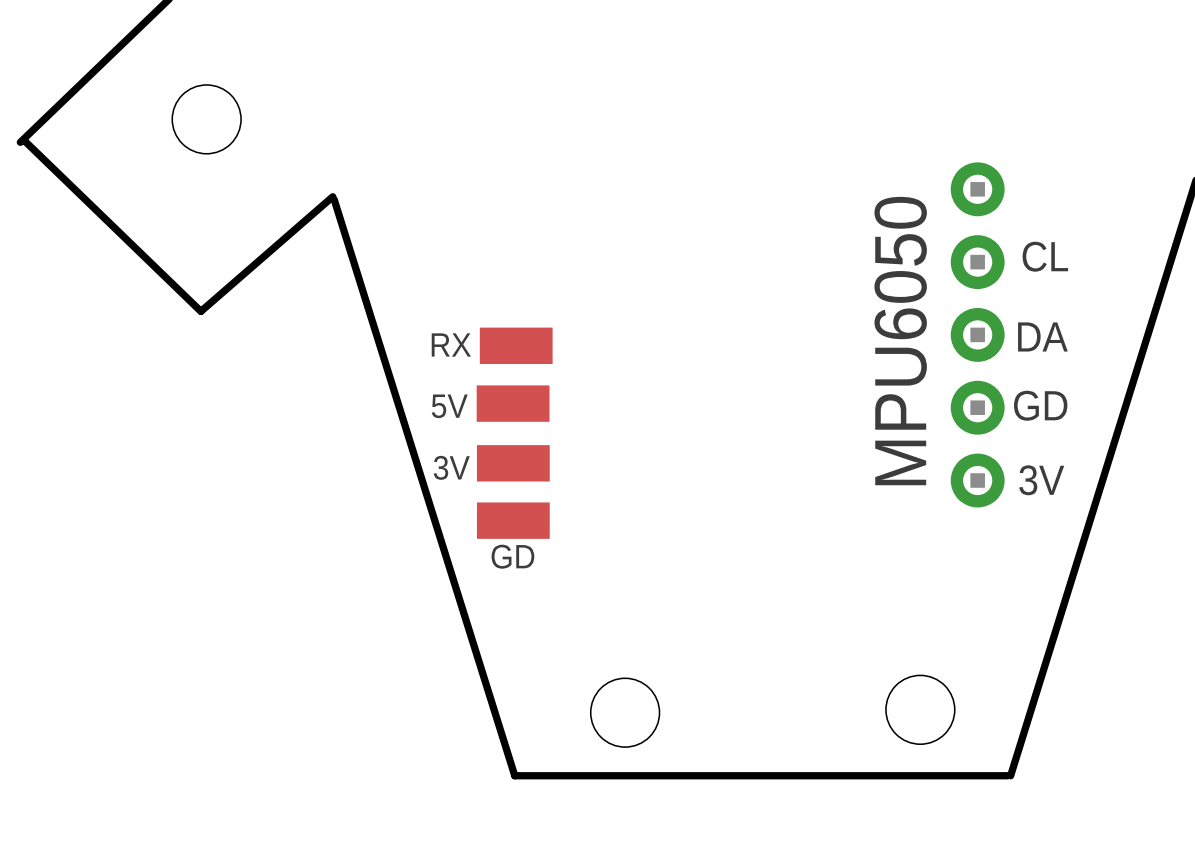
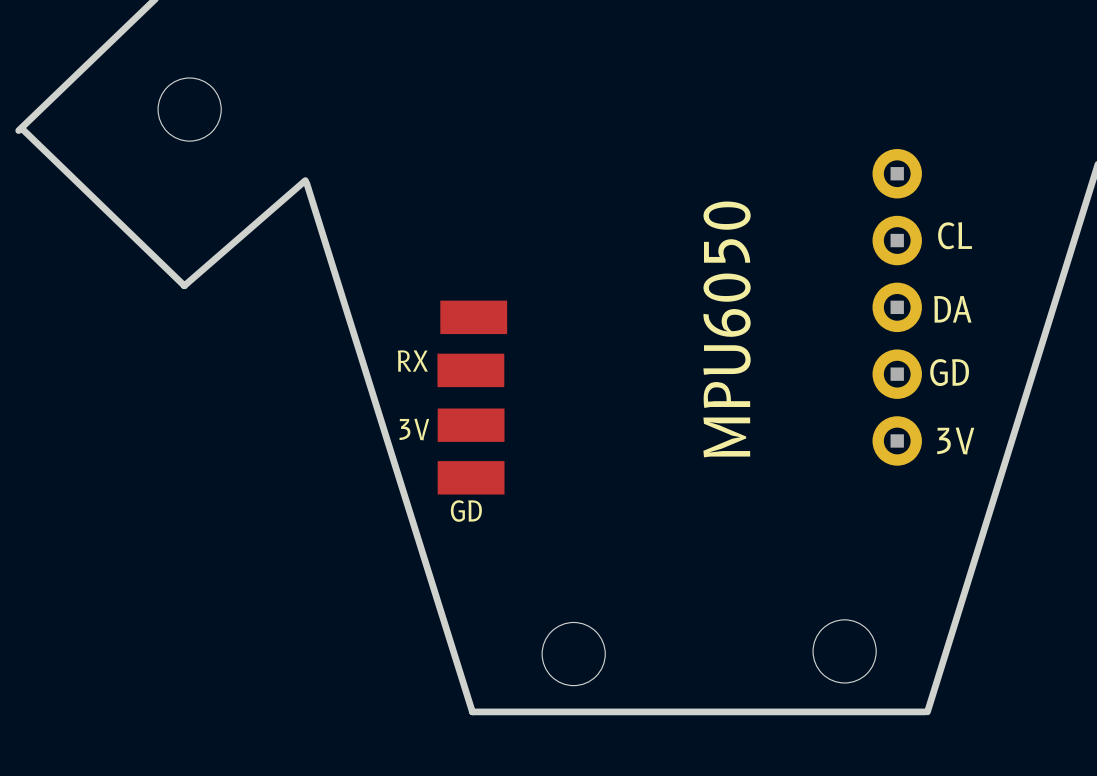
text position: MPU6050 (900, 341) -> MPU6050 (727, 329)
text: RX (451, 344) -> none
text: 5V (449, 406) -> RX (412, 360)

